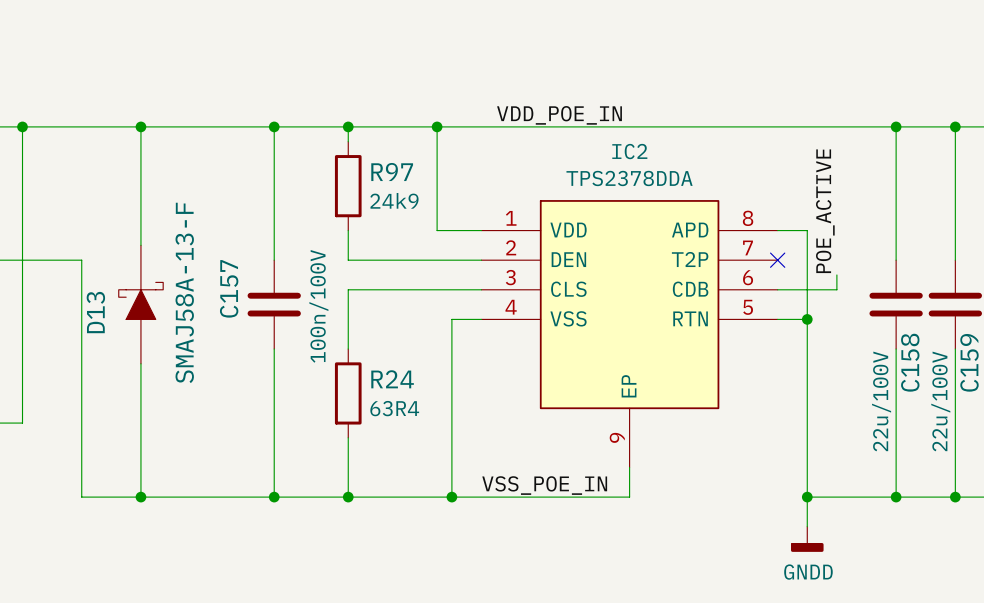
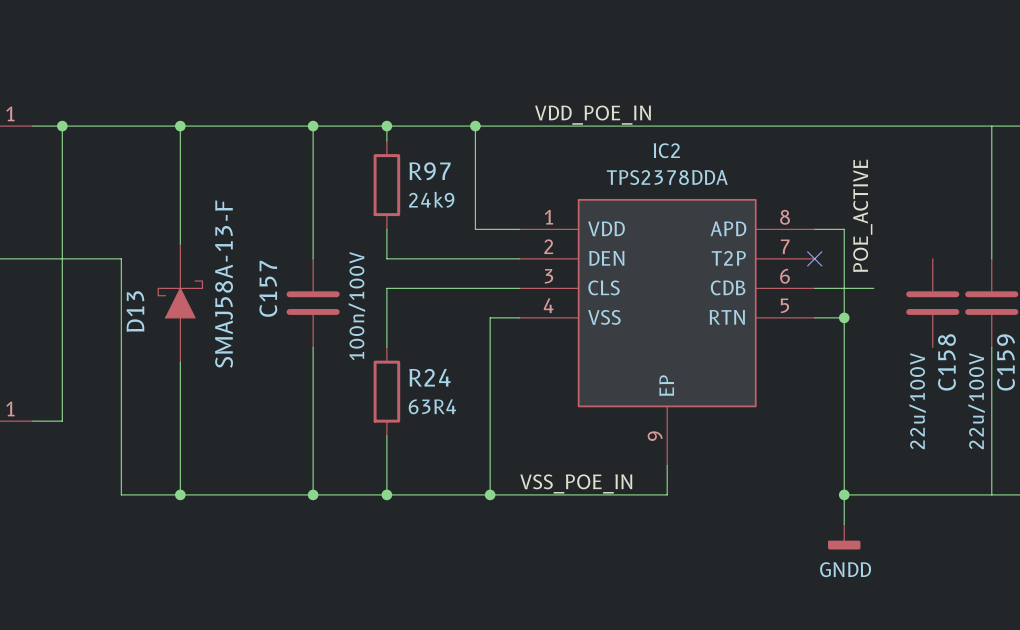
wire: (896, 126) (896, 260) -> none
junction: (896, 126) -> none
junction: (955, 126) -> none
wire: (836, 274) (836, 289) -> none
wire: (896, 349) (896, 497) -> none
junction: (896, 497) -> none
junction: (955, 497) -> none

